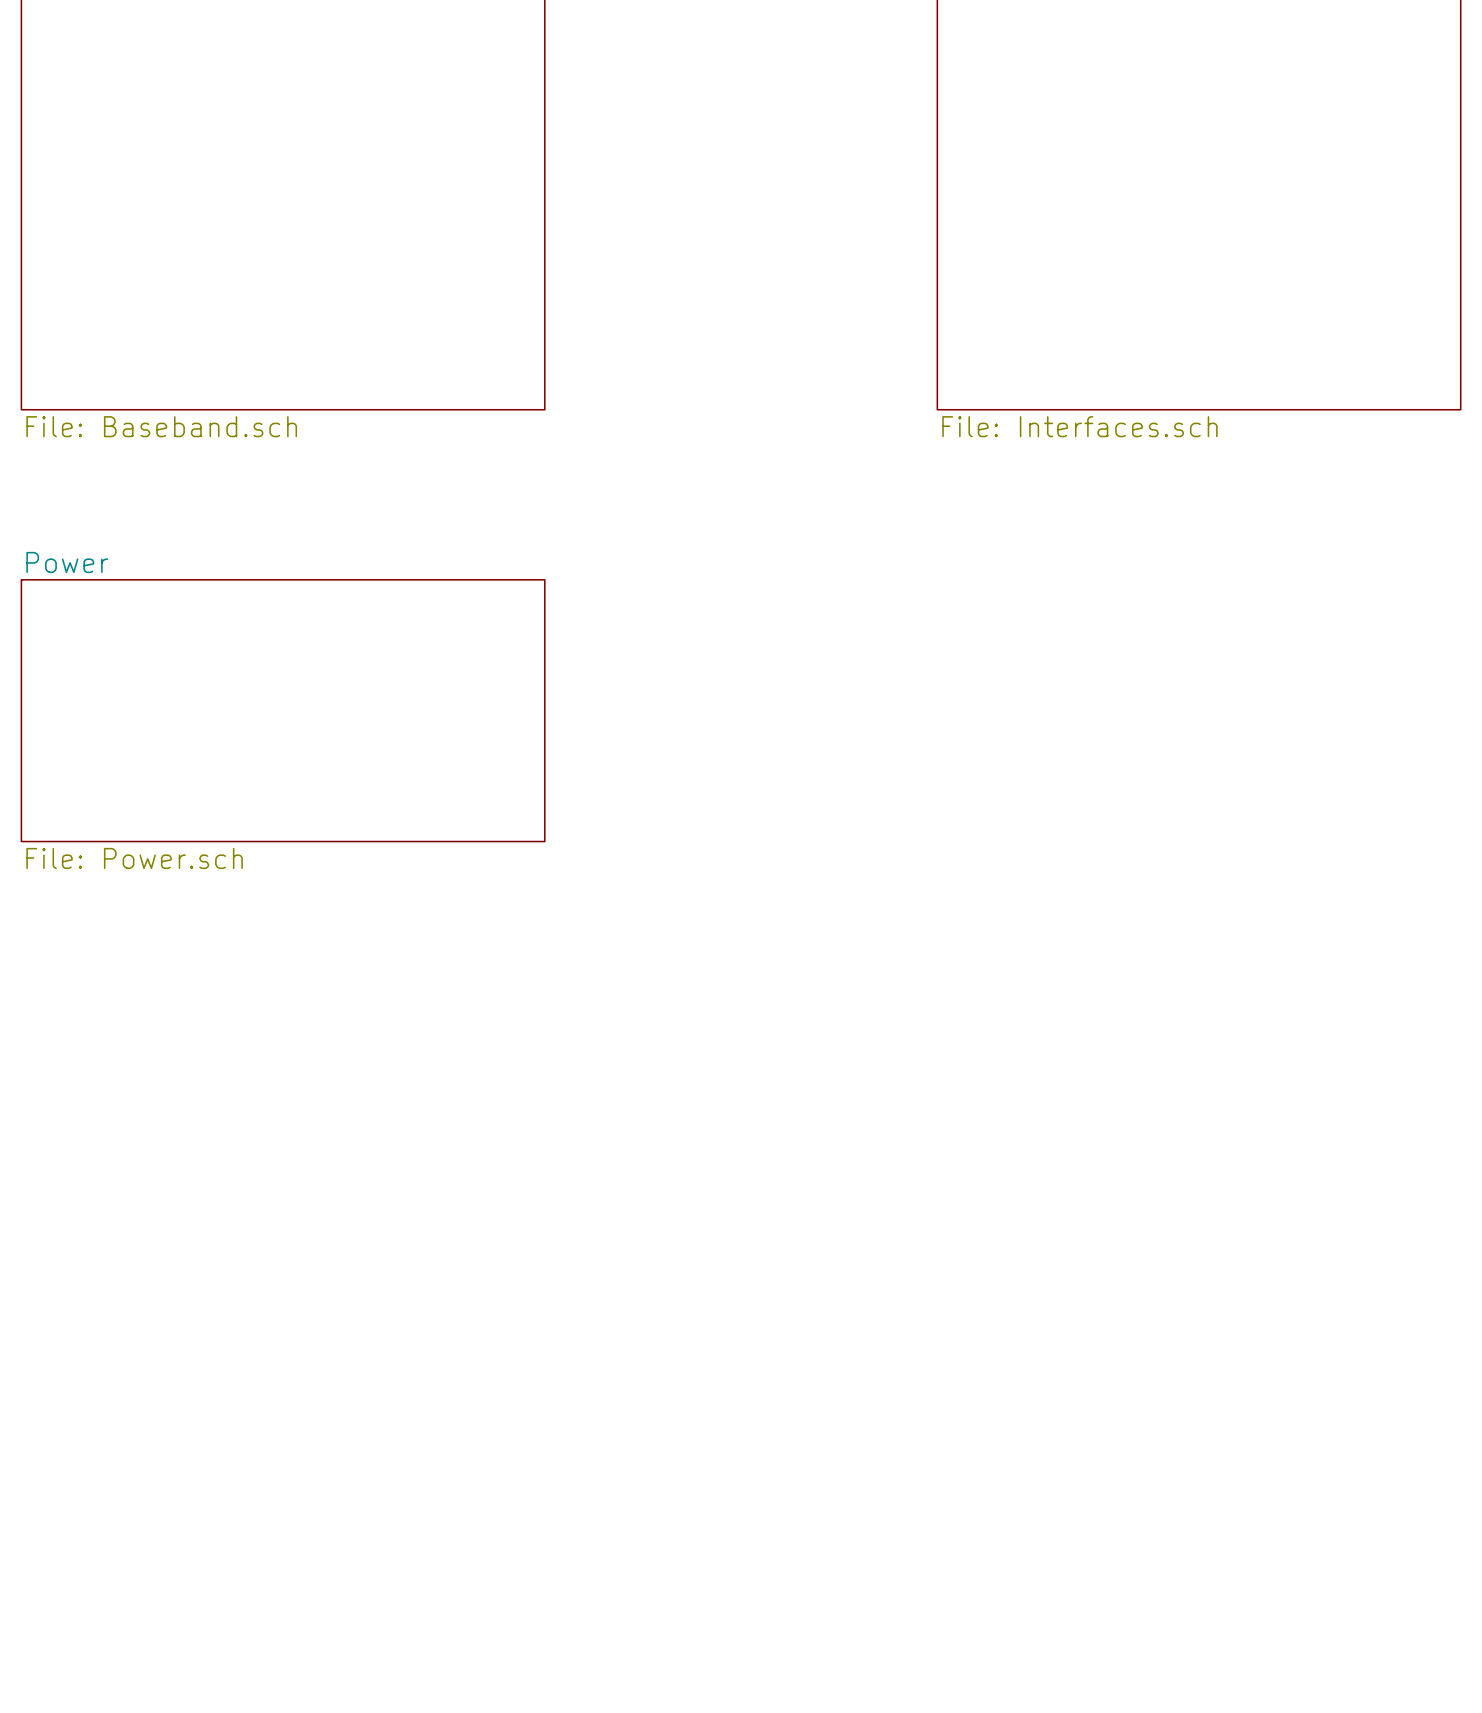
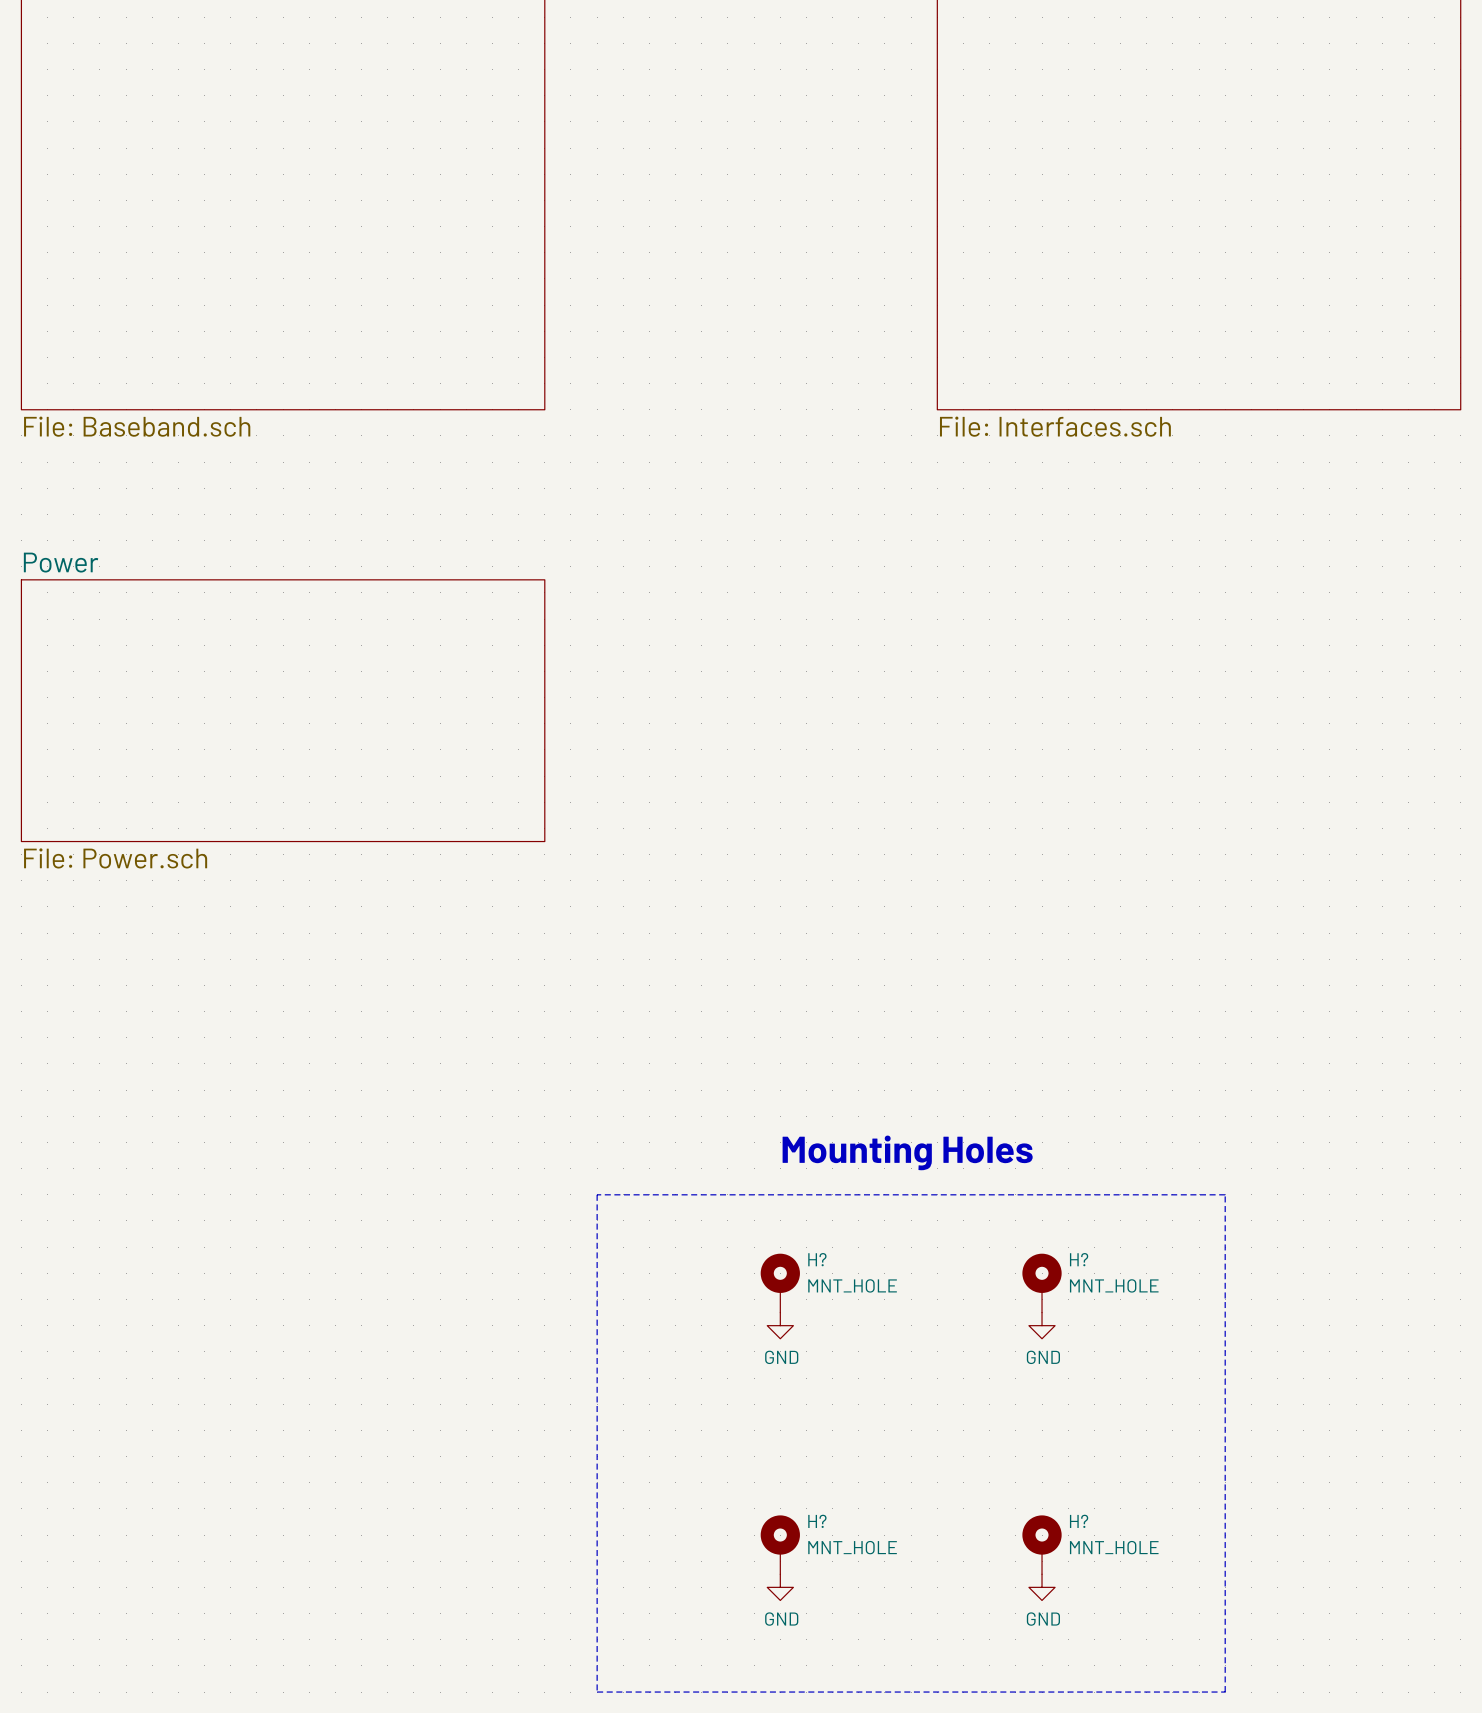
text: none -> Mounting Holes (907, 1152)
line: none -> (597, 1194) (597, 1692) (1225, 1692) (1225, 1194) (597, 1194)
H?: none -> MNT_HOLE (780, 1283)
H?: none -> MNT_HOLE (1042, 1283)
power symbol: none -> GND (780, 1325)
power symbol: none -> GND (1042, 1325)
H?: none -> MNT_HOLE (780, 1544)
H?: none -> MNT_HOLE (1042, 1544)
power symbol: none -> GND (780, 1587)
power symbol: none -> GND (1042, 1587)

